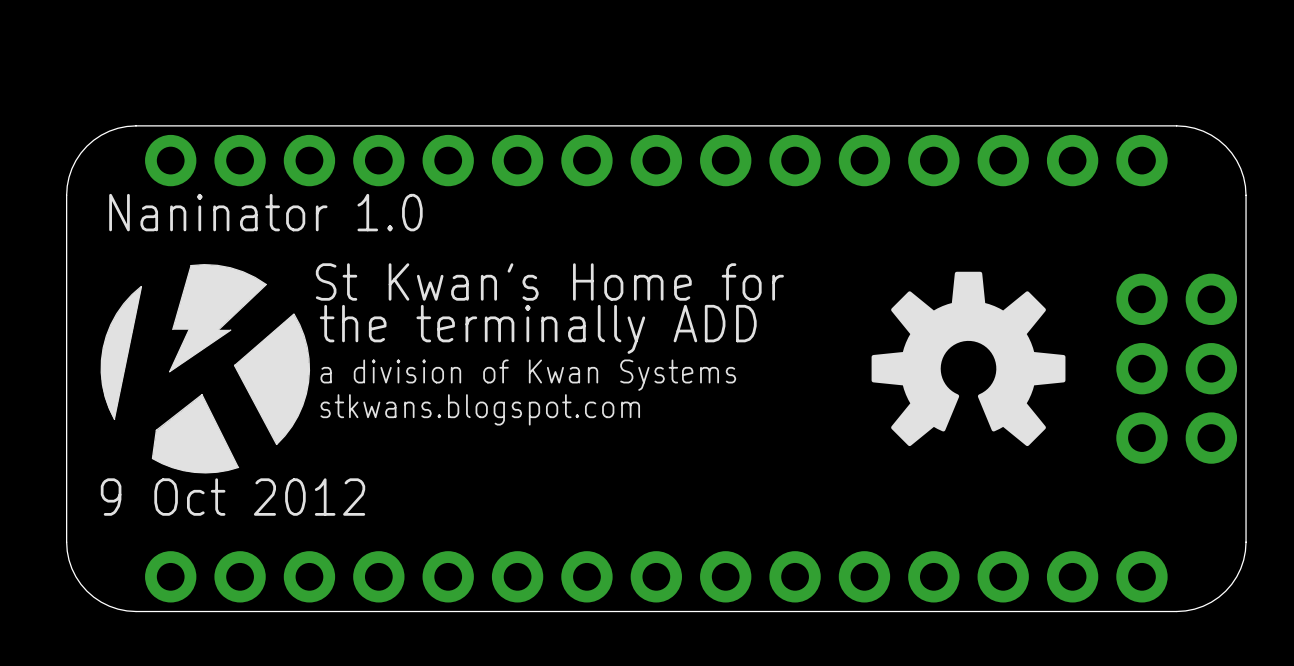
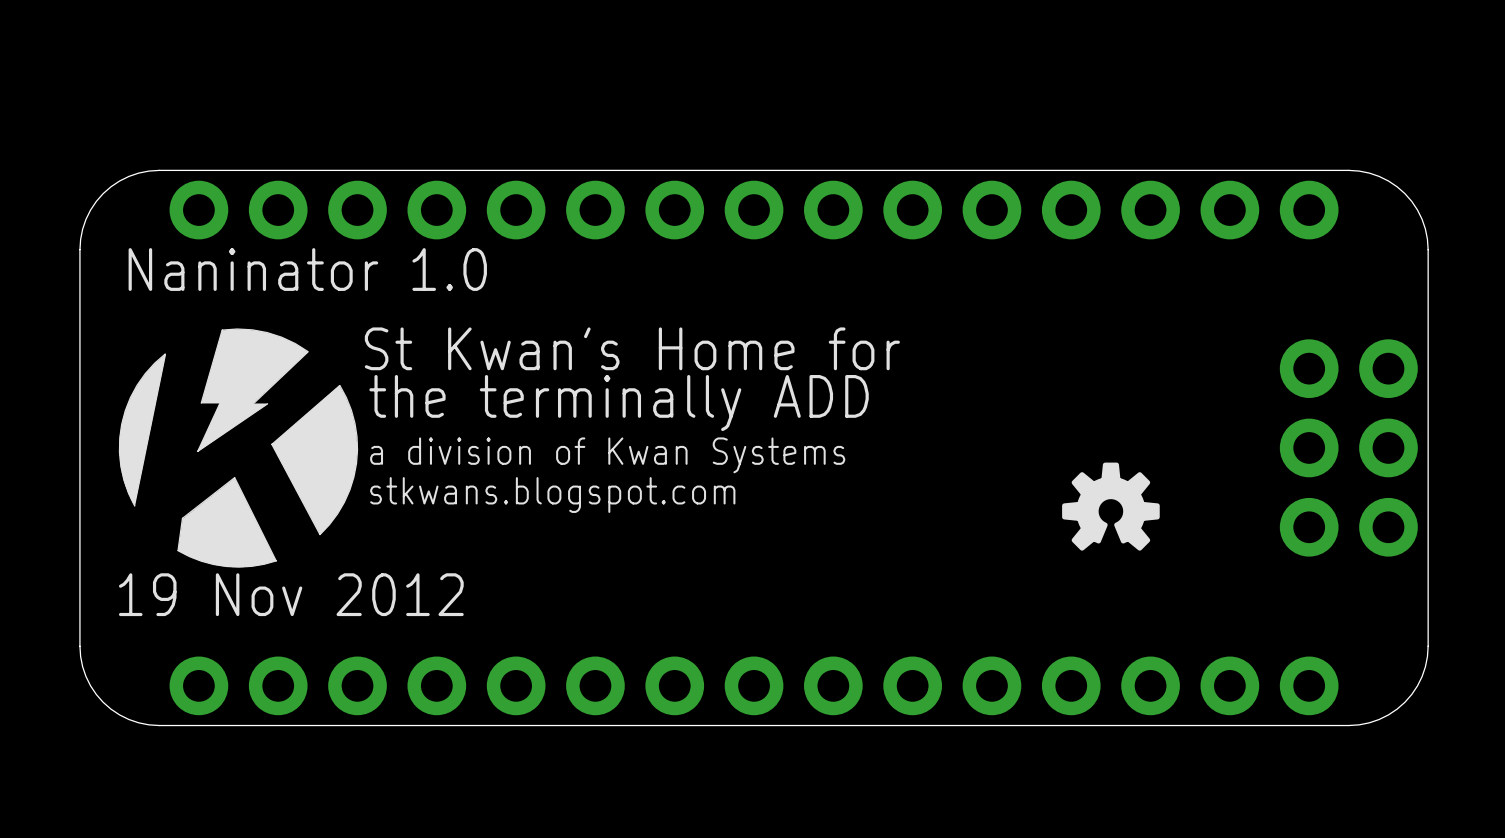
drawing: [871, 271, 1066, 447] -> none
drawing: none -> [1062, 462, 1160, 551]
text: 9 Oct 2012 (232, 497) -> 19 Nov 2012 (291, 594)

